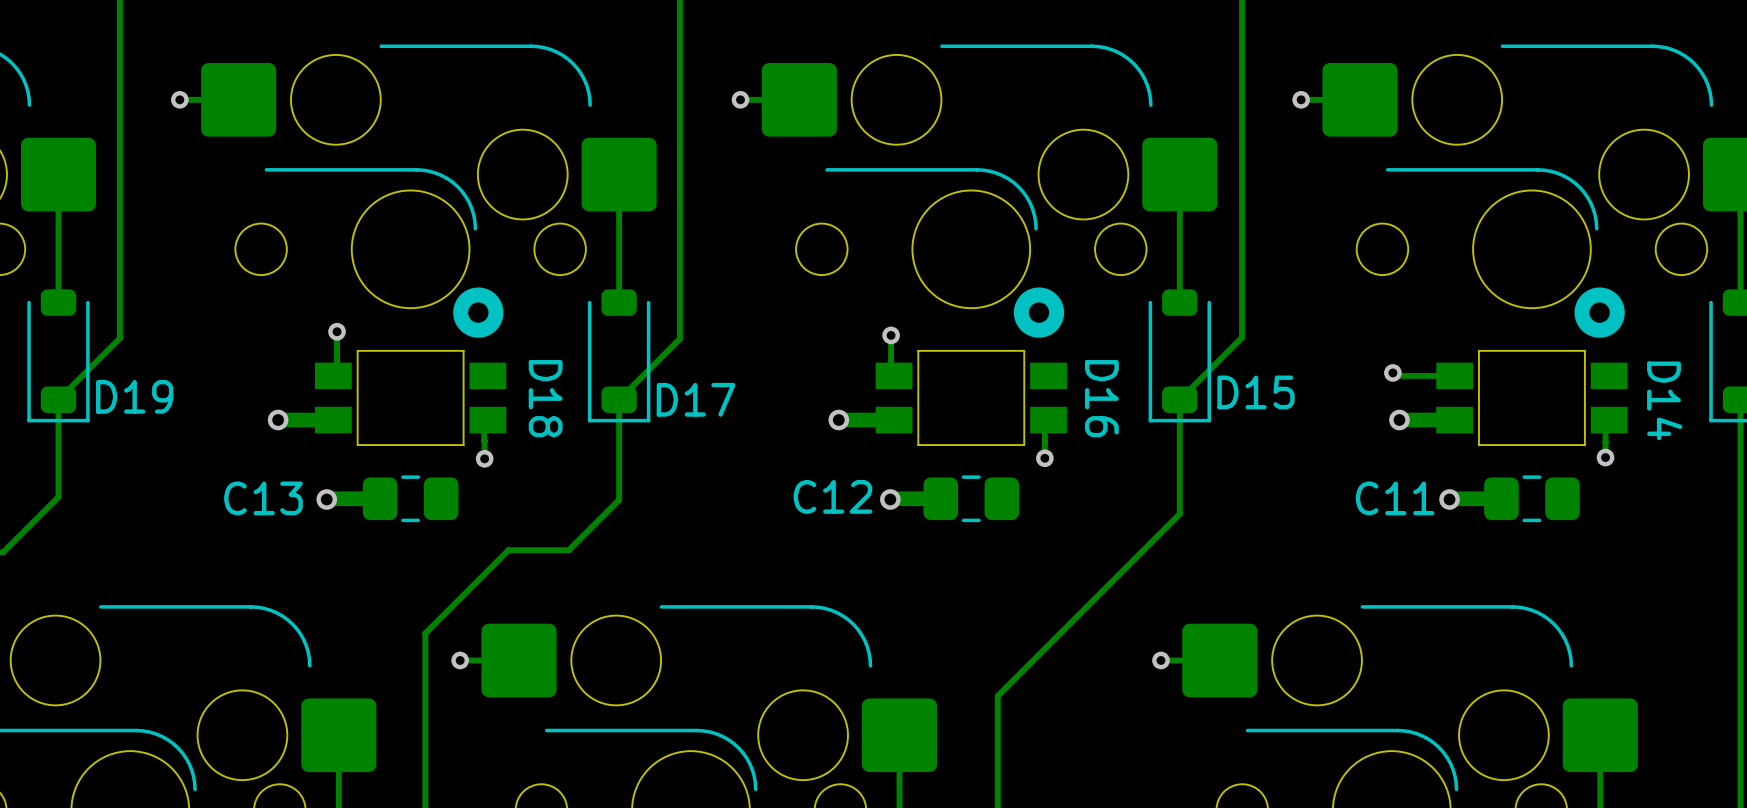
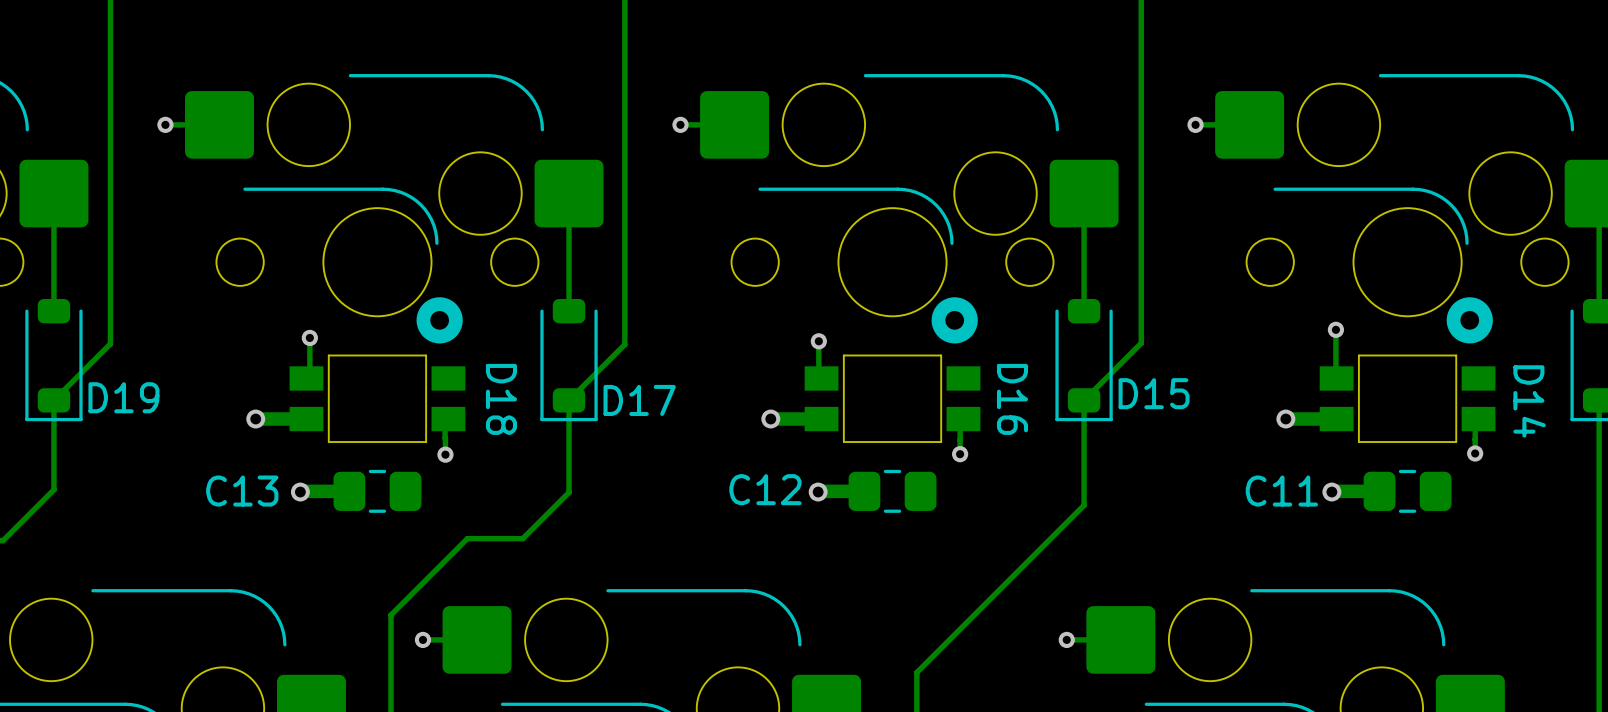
track: none -> (1335, 329) (1336, 378)
track: (1392, 372) (1395, 375) (1458, 375) -> none
via position: (1392, 372) -> (1335, 329)

